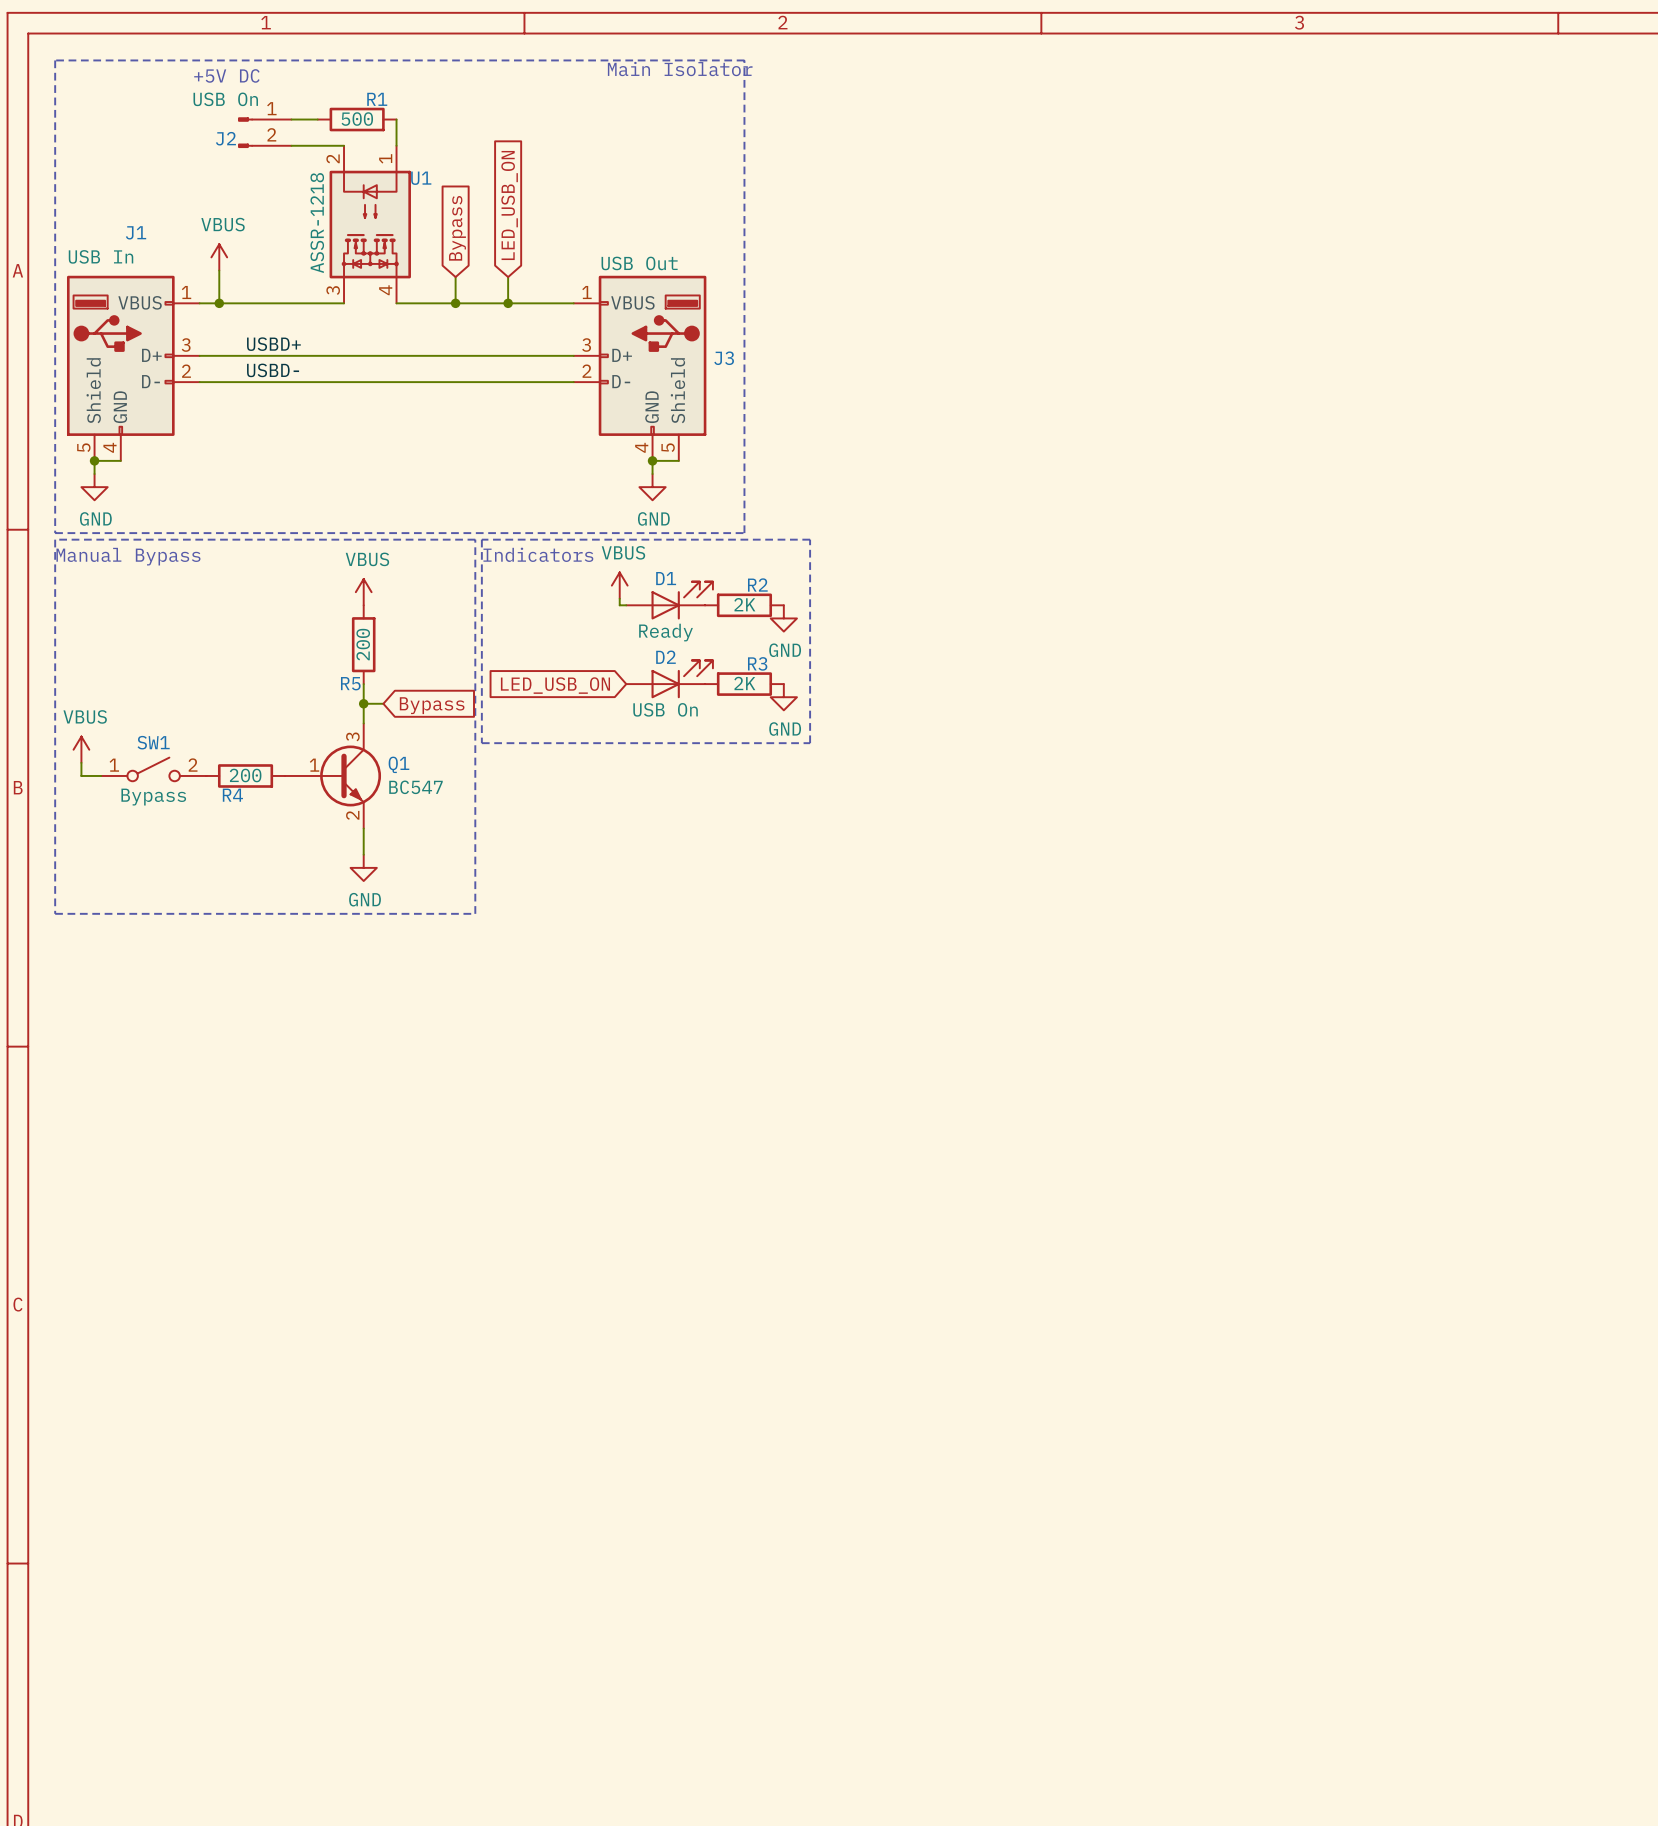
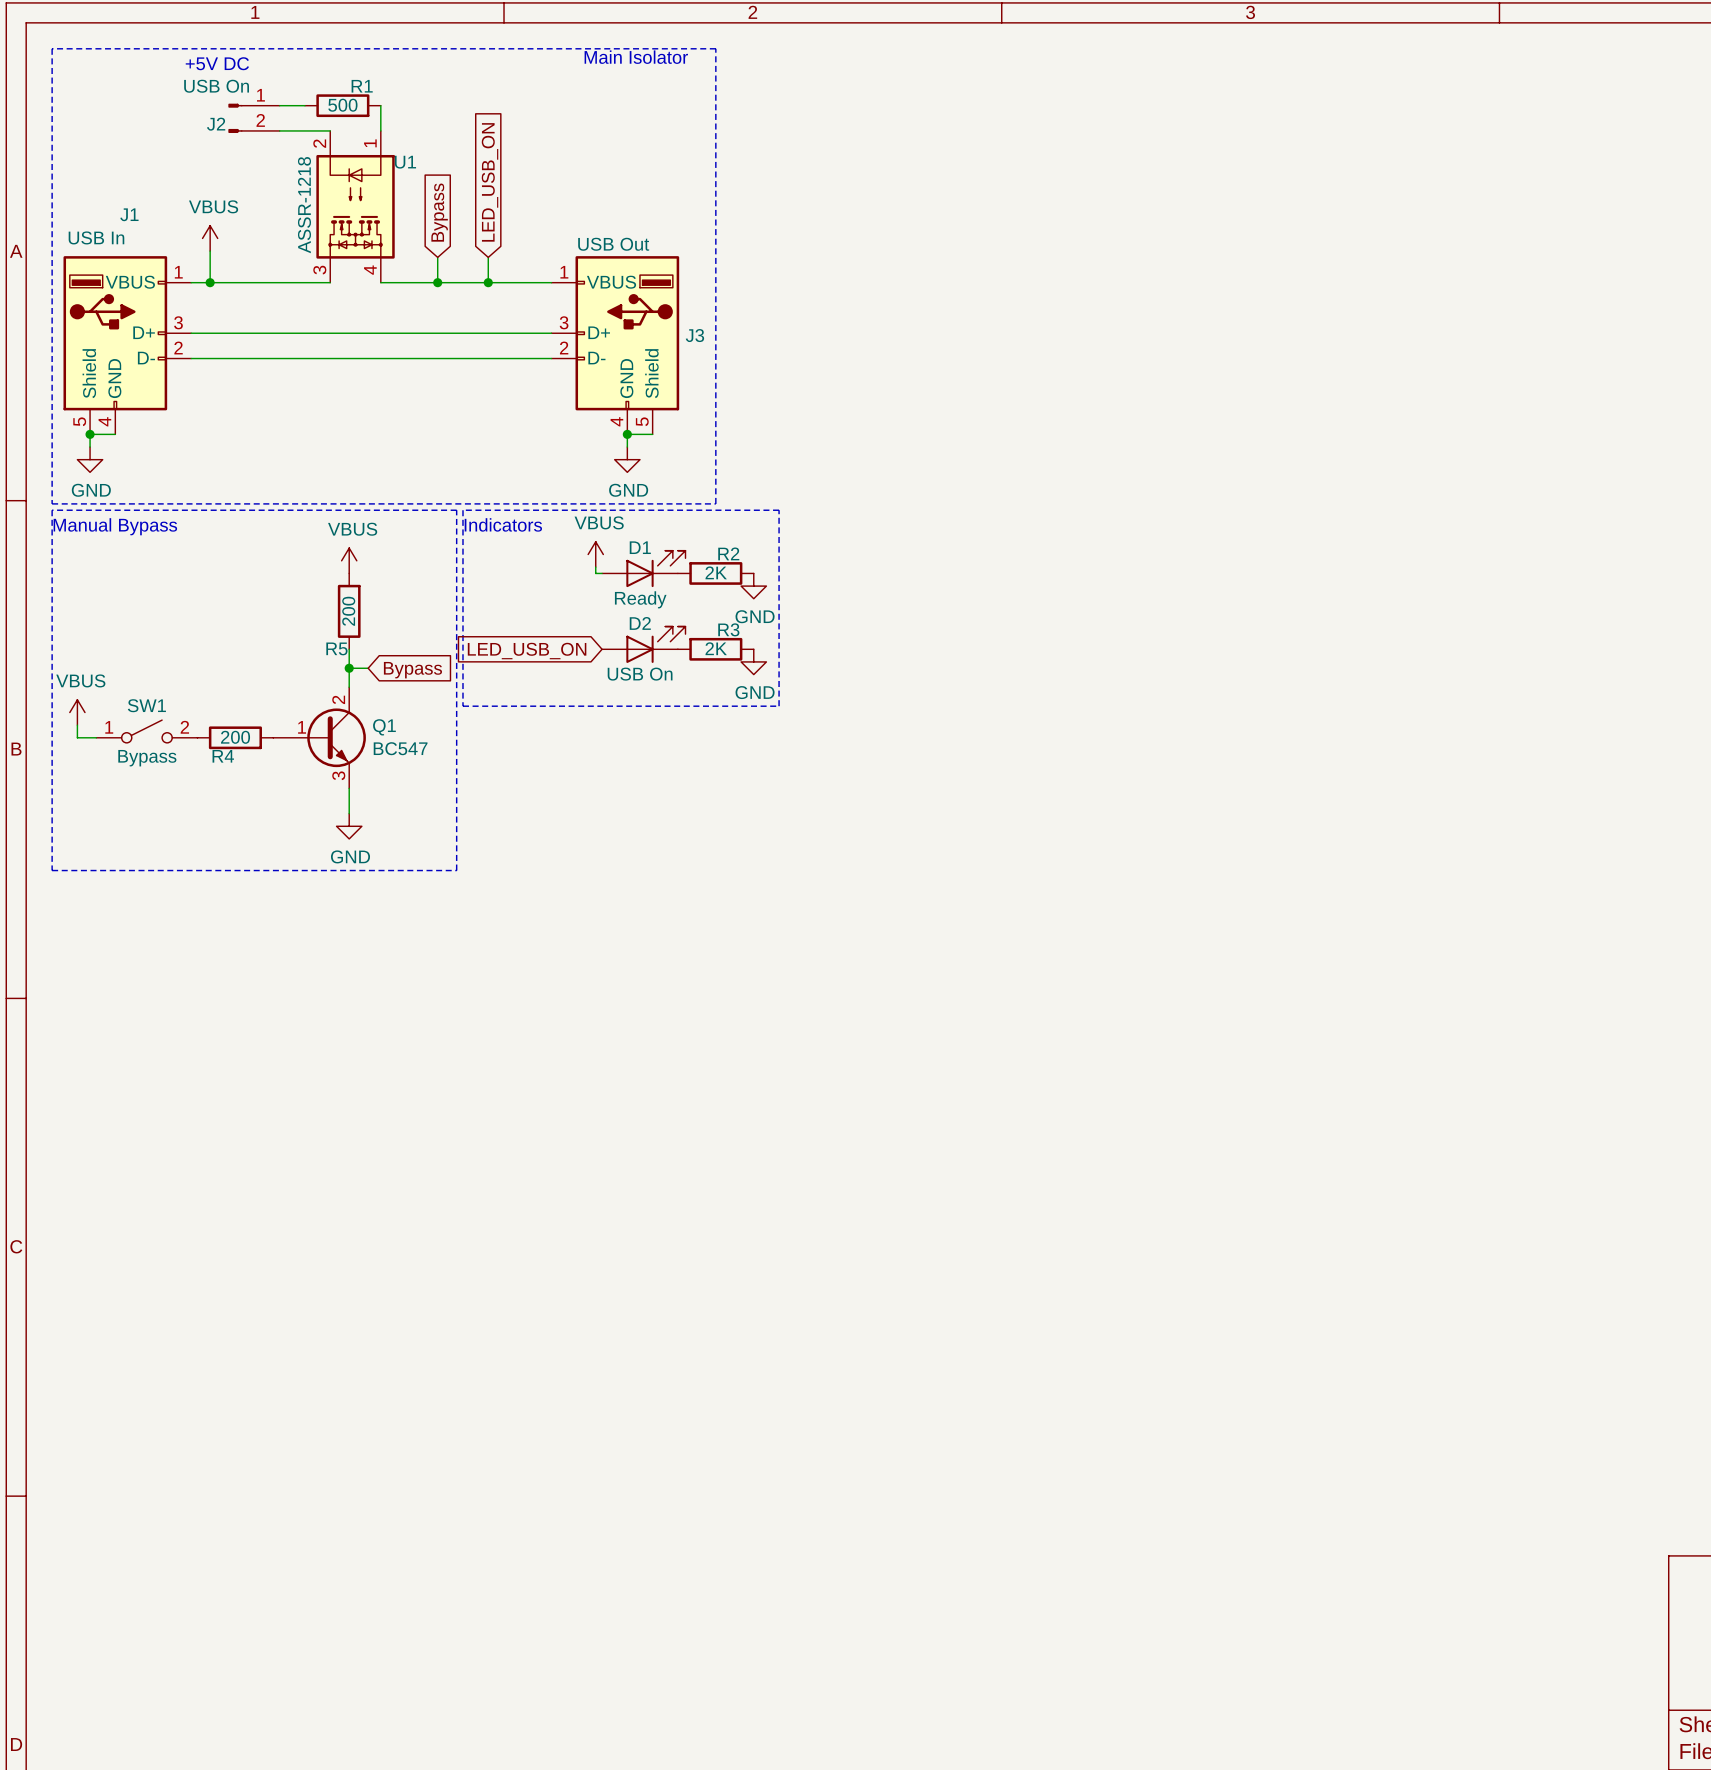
label: USBD+ (273, 344) -> none
label: USBD- (273, 370) -> none
Q1 pin number: 3 (352, 736) -> 2 (338, 699)
Q1 pin number: 2 (352, 815) -> 3 (338, 775)

